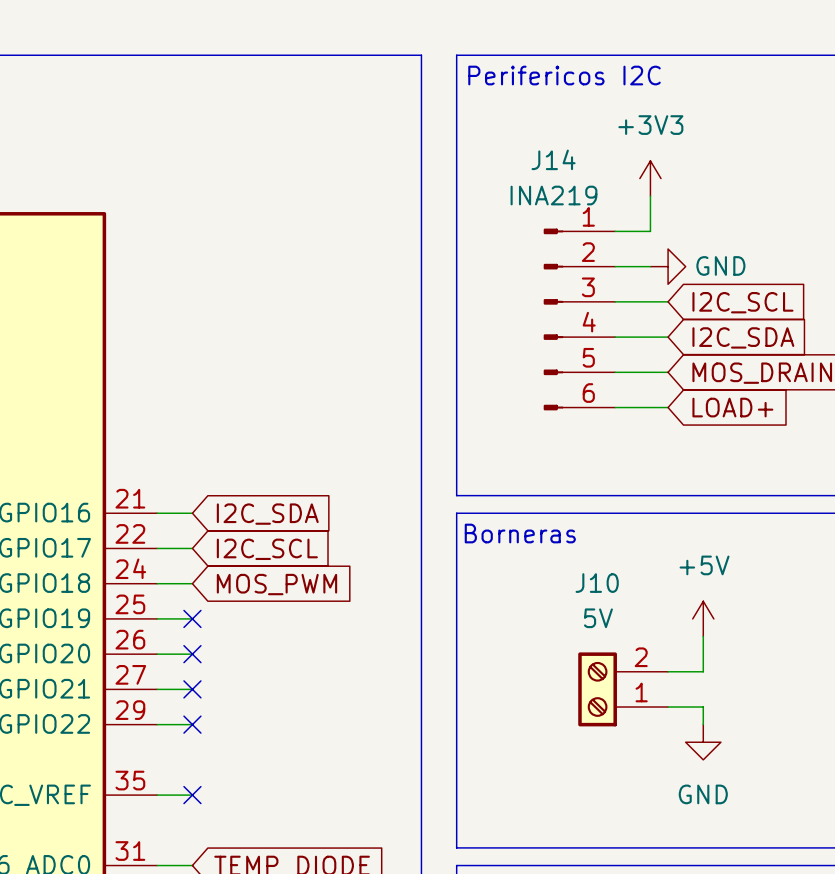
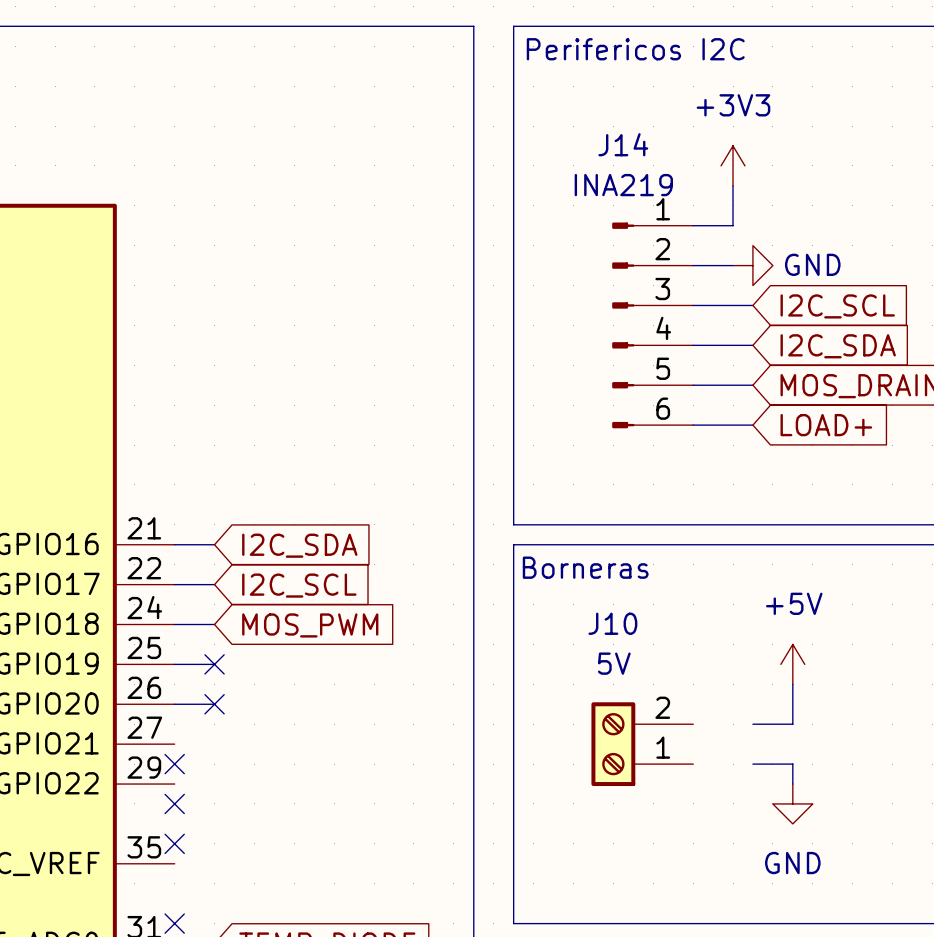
wire: (157, 689) (192, 689) -> none
no-connect mark: (192, 689) -> none
J10 position: (623, 689) -> (642, 744)
no-connect mark: none -> (174, 764)
wire: (157, 724) (192, 724) -> none
no-connect mark: (192, 724) -> none
no-connect mark: none -> (174, 803)
no-connect mark: none -> (174, 843)
wire: (157, 795) (192, 795) -> none
no-connect mark: (192, 795) -> none
no-connect mark: none -> (174, 923)

